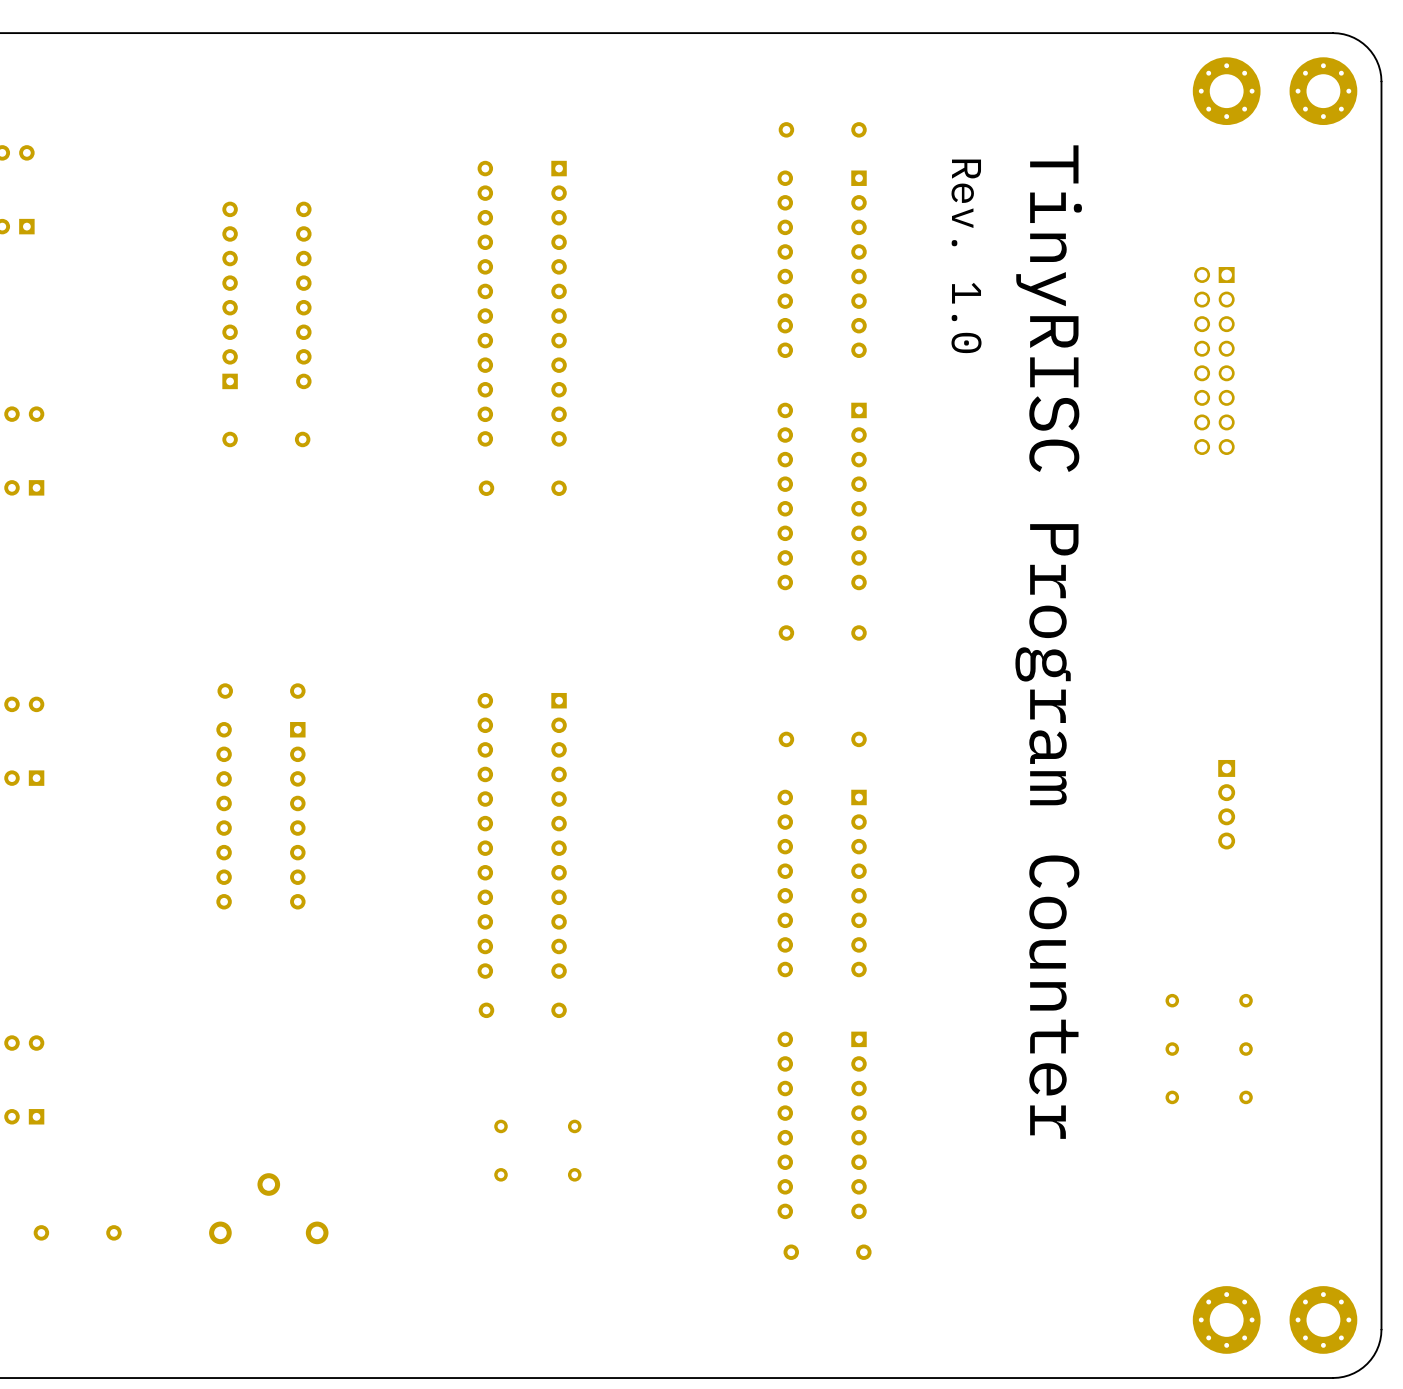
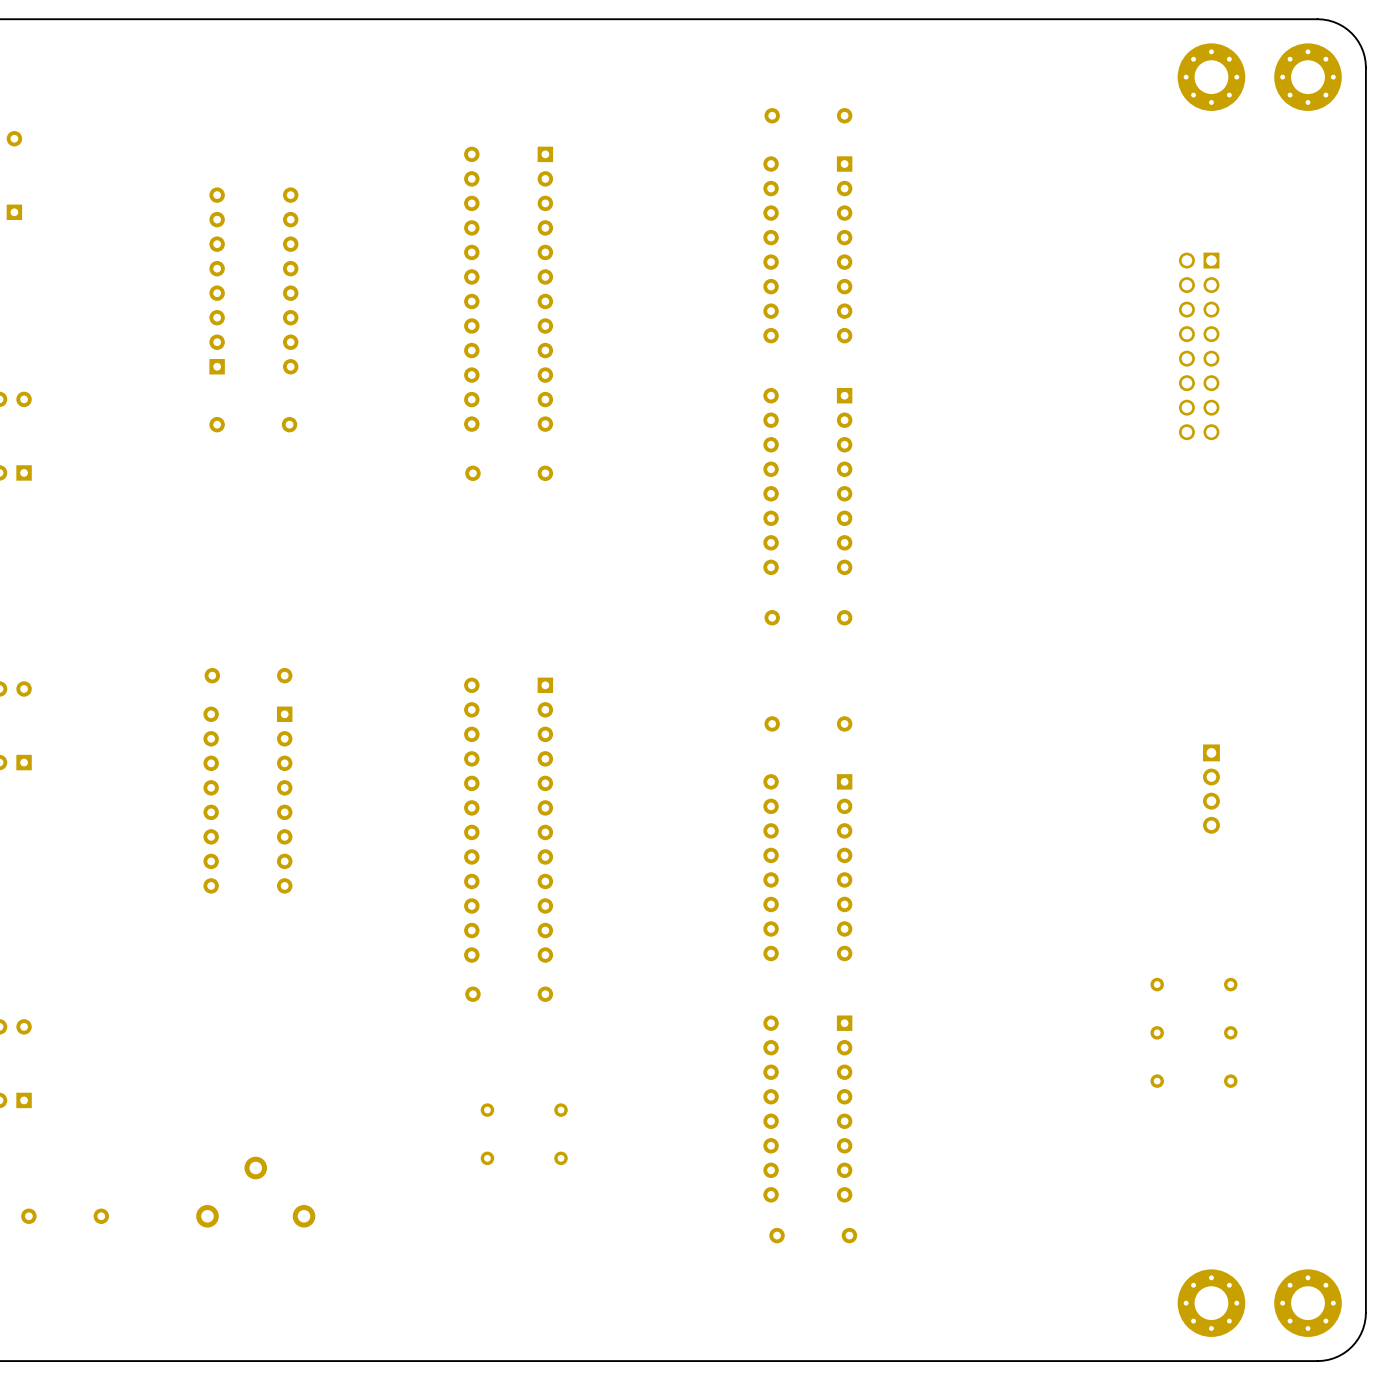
text: Rev. 1.0 (966, 256) -> none
text: TinyRISC Program Counter (1048, 642) -> none

